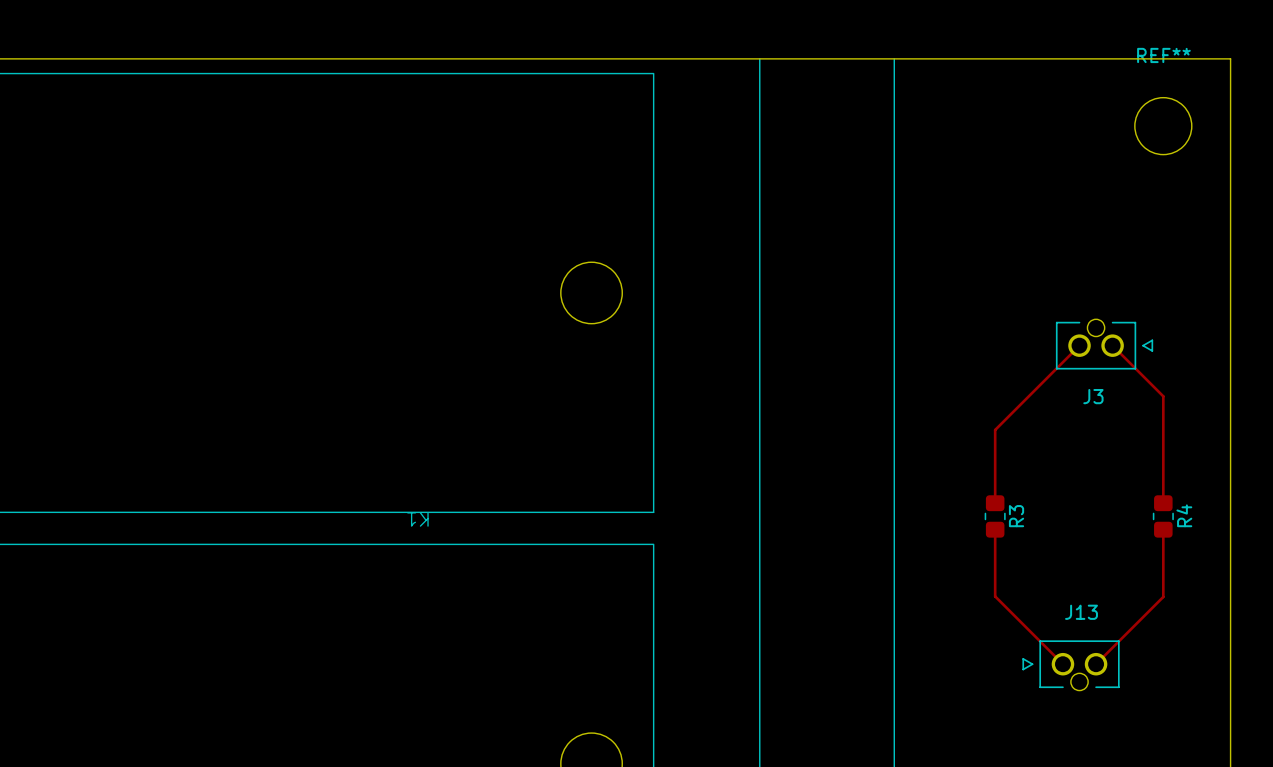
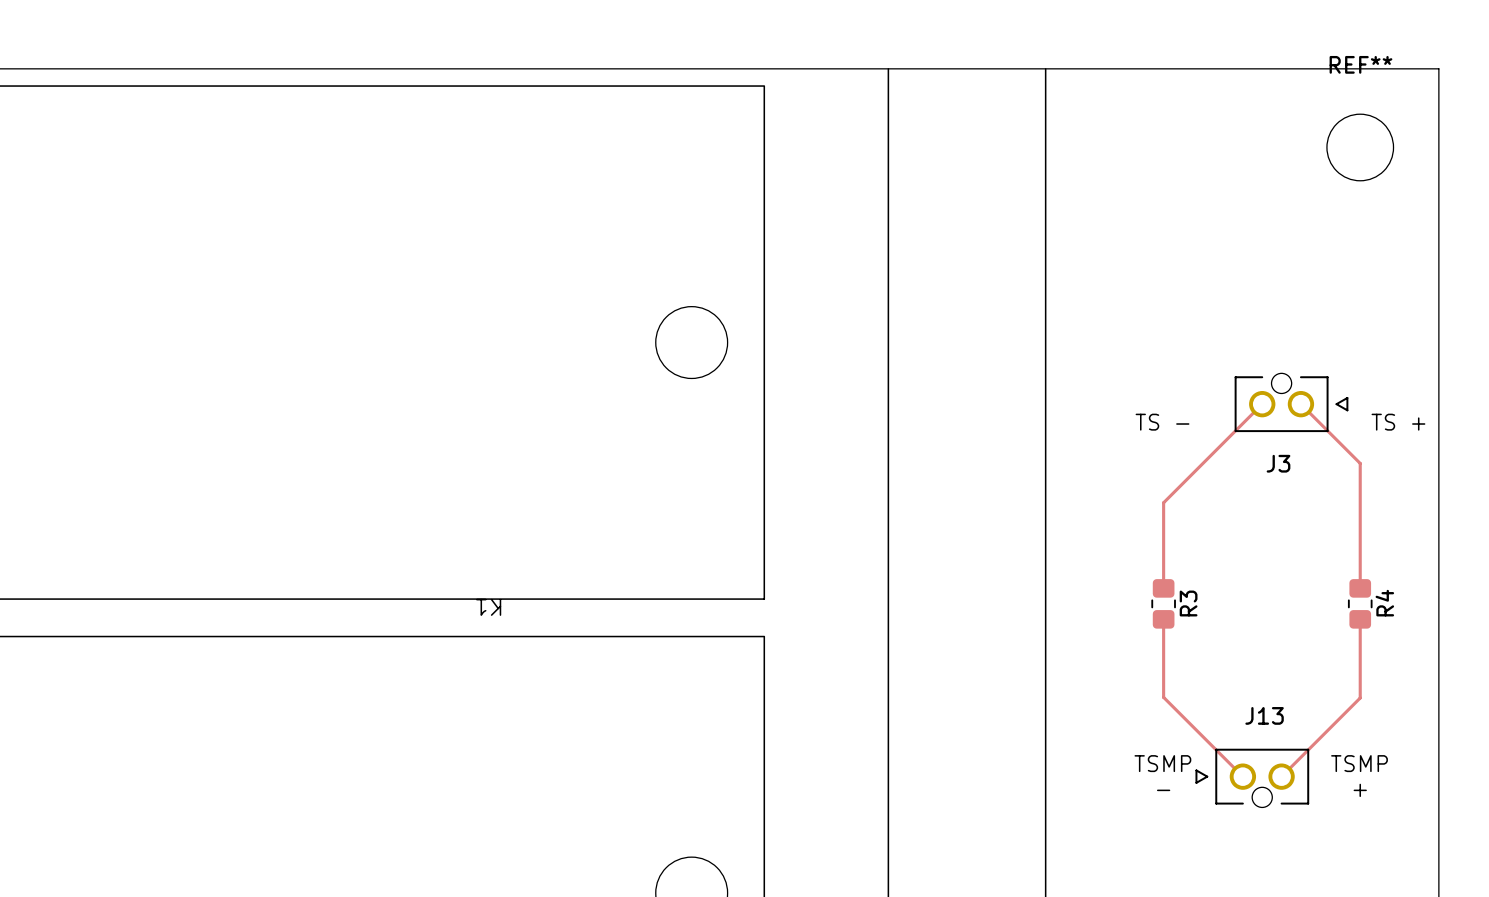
text: none -> TS - (1162, 422)
text: none -> TS + (1398, 422)
text: none -> TSMP (1162, 763)
text: none -> TSMP (1359, 763)
text: none -> - (1163, 790)
text: none -> + (1360, 790)

